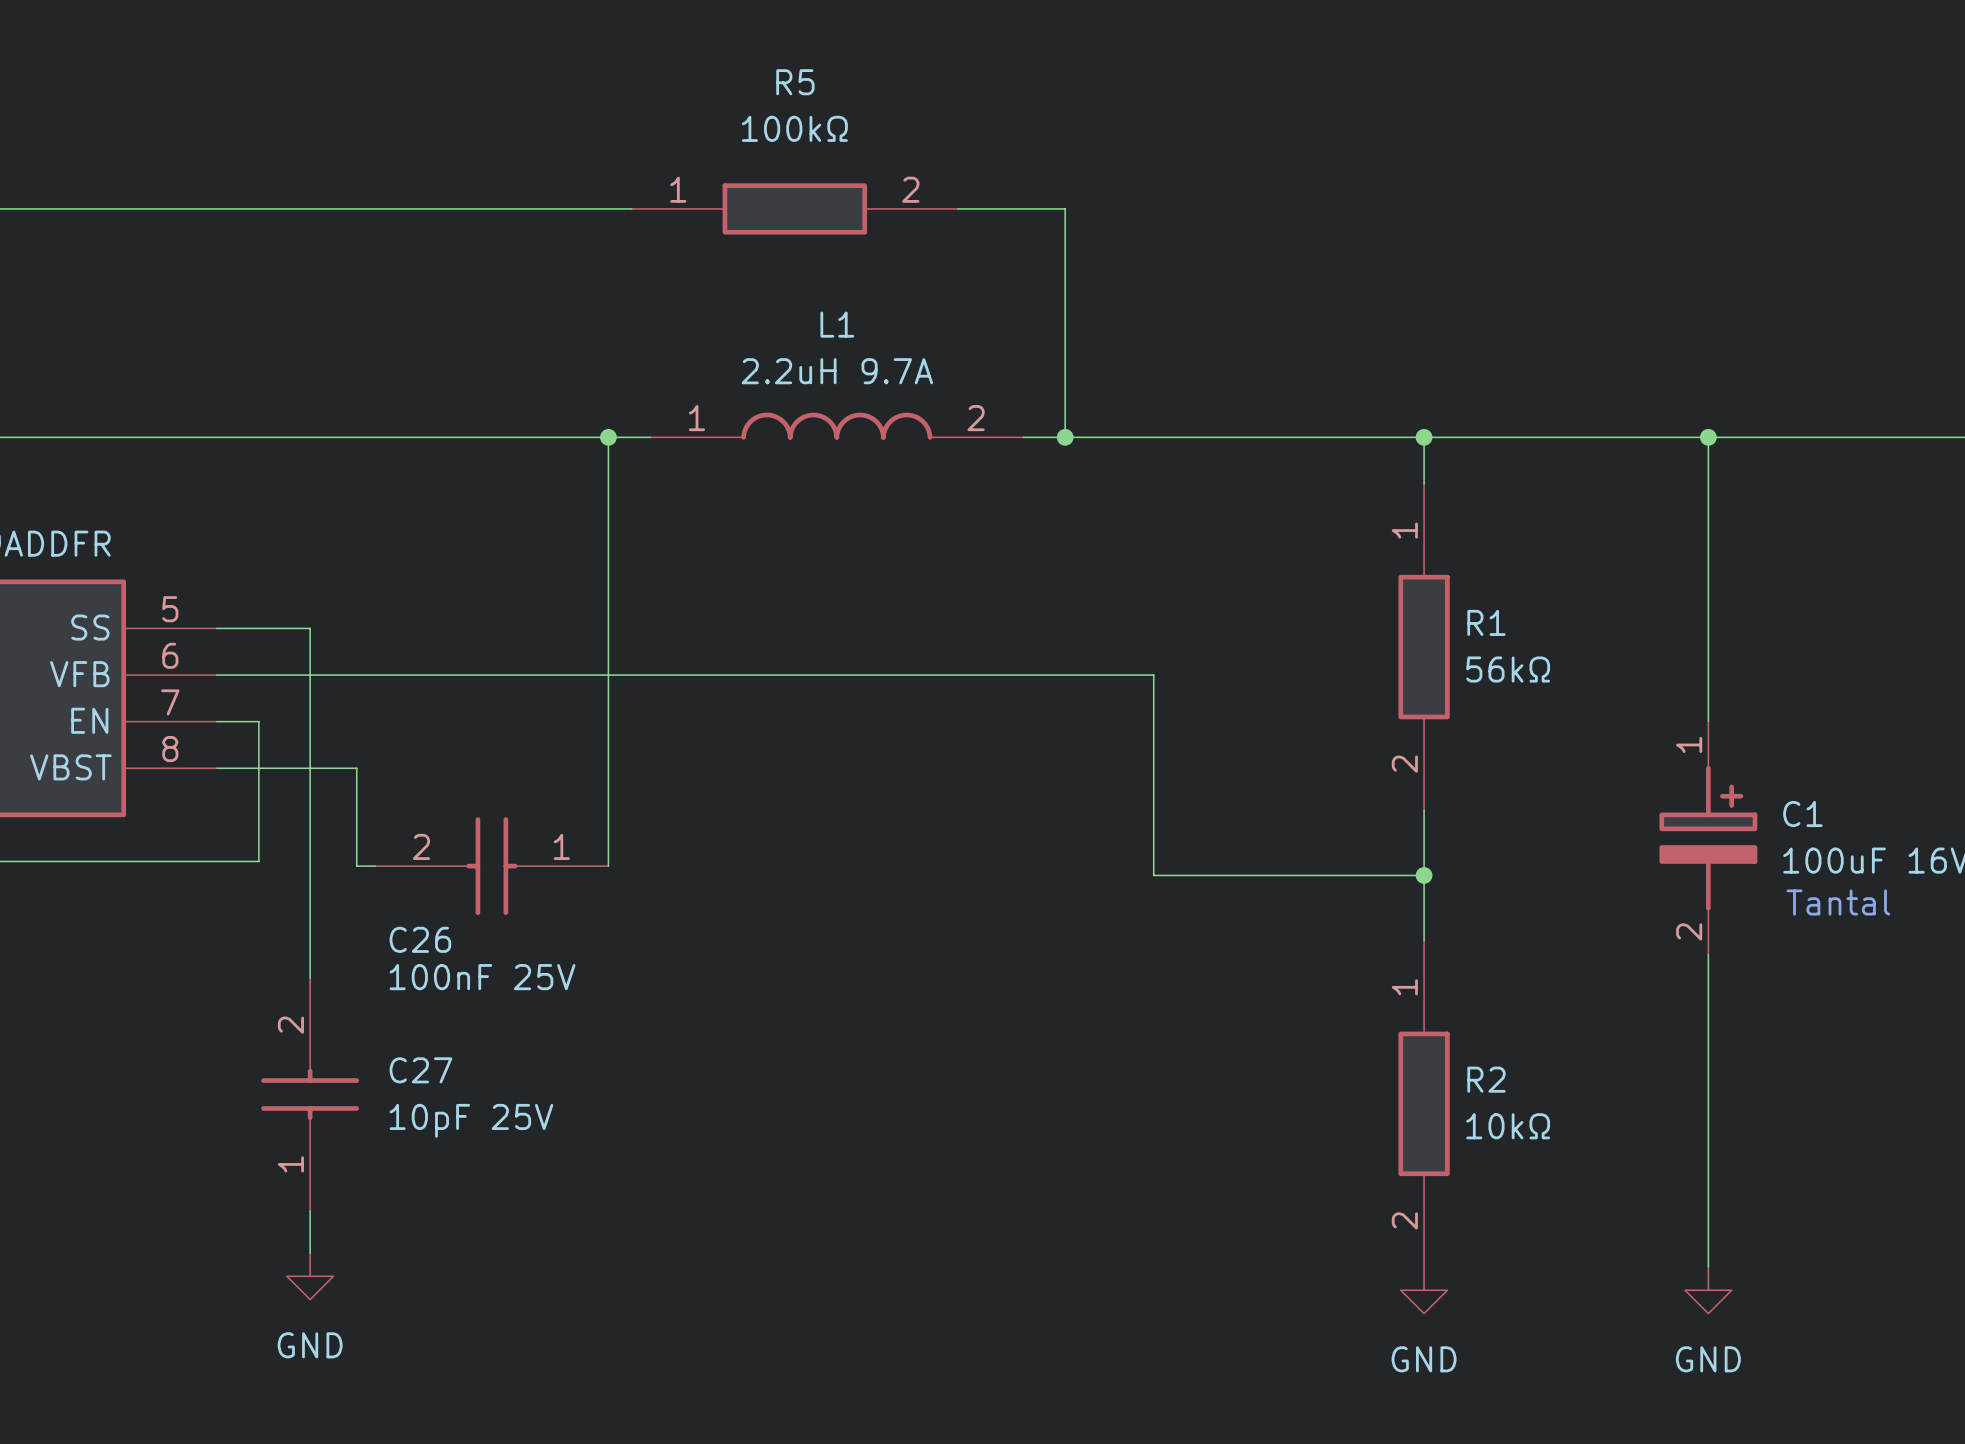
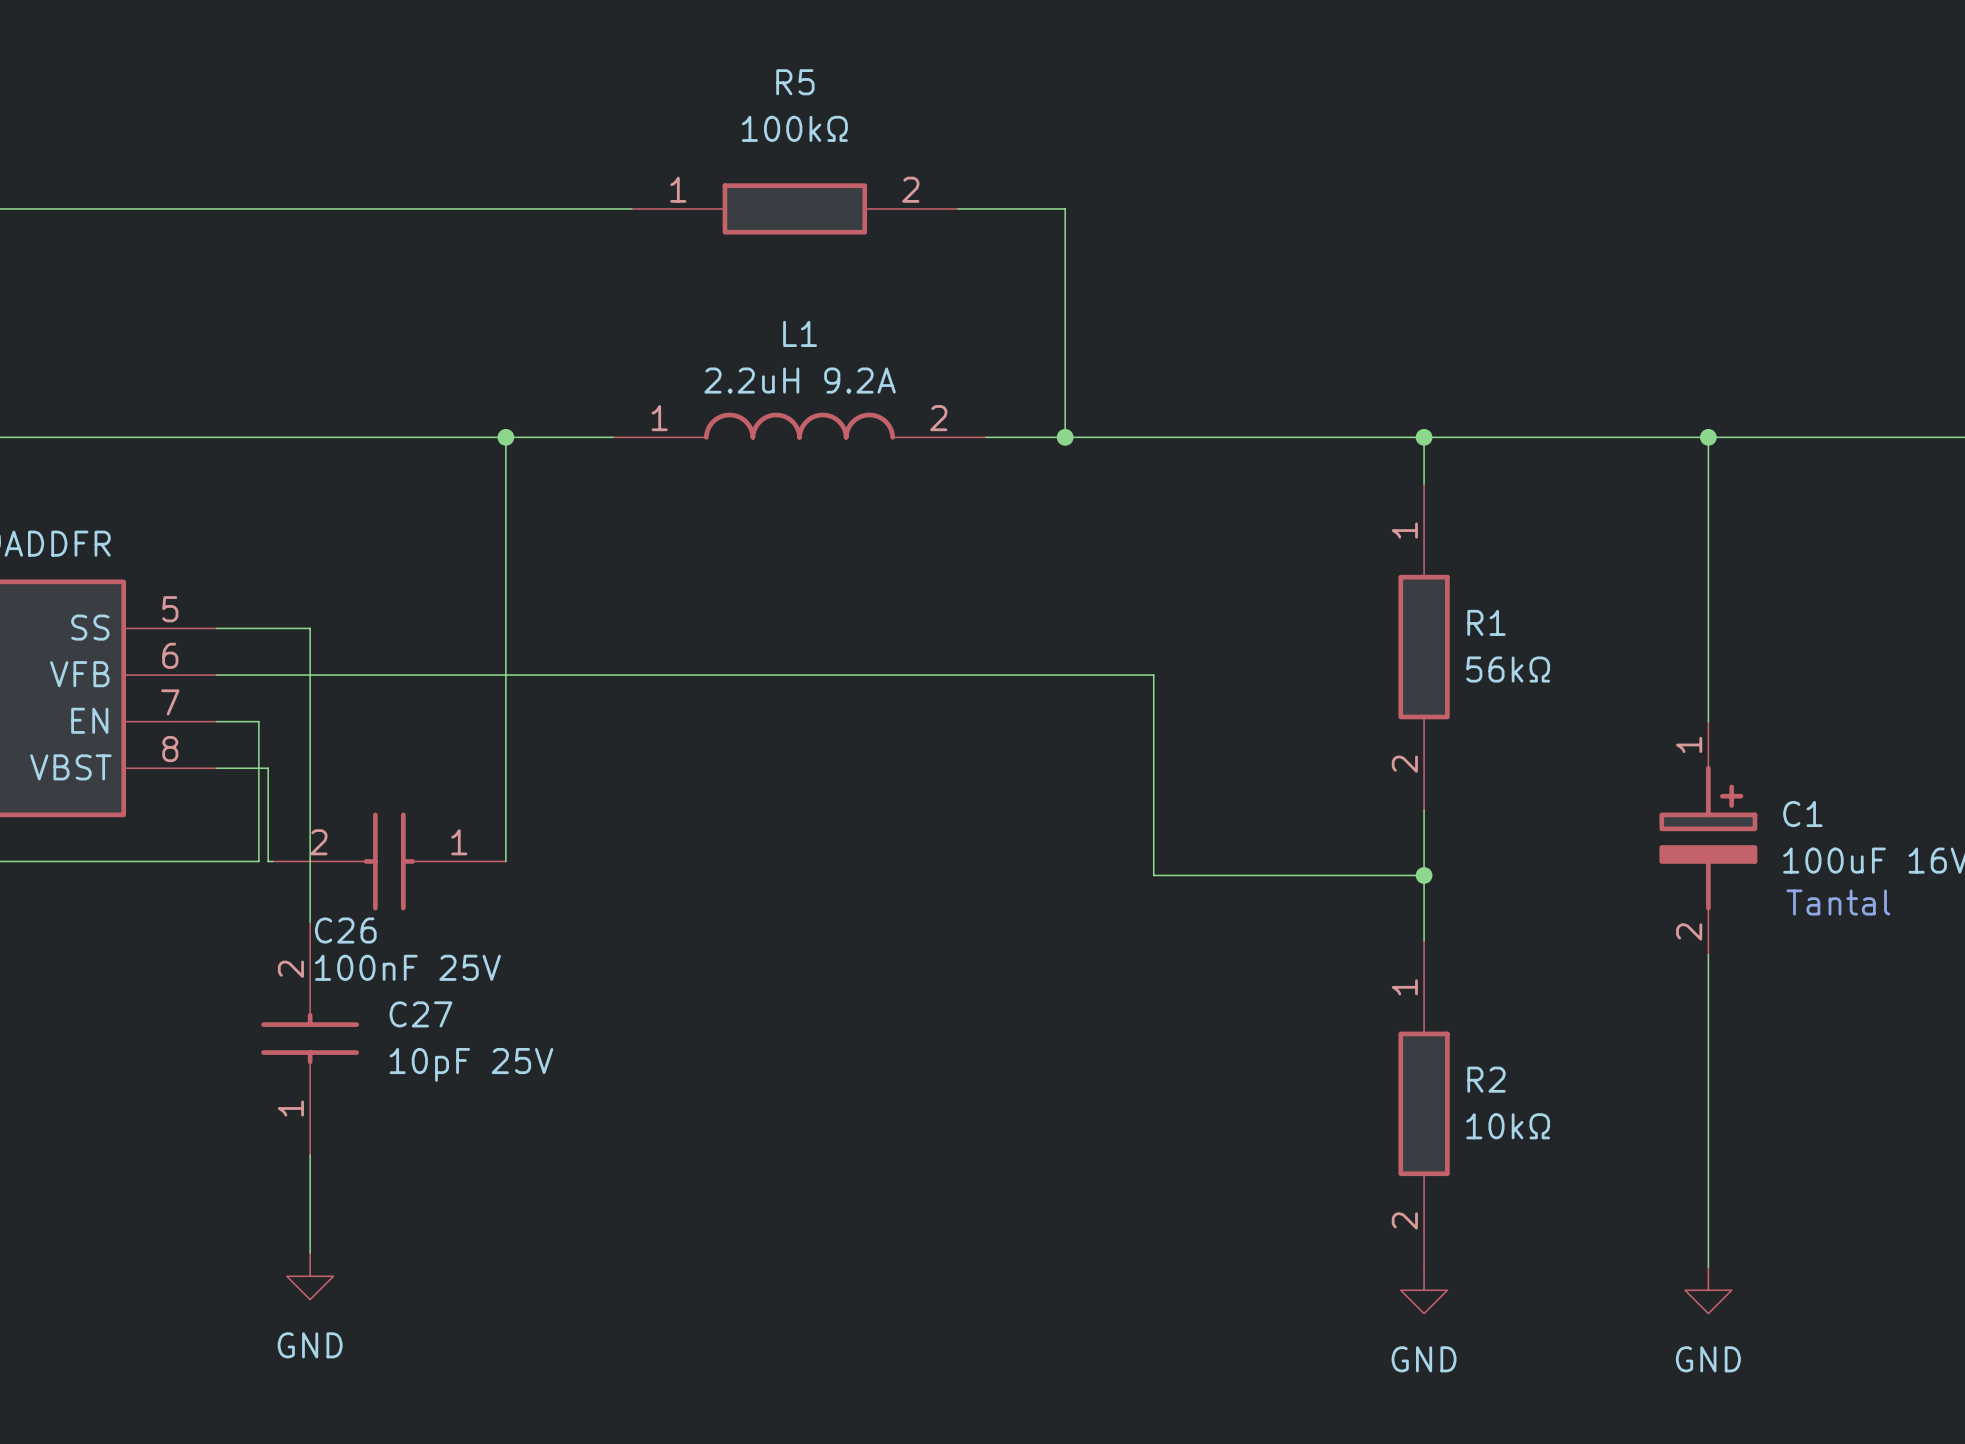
L1 name position: L1 (837, 324) -> L1 (800, 333)
L1 value: 2.2uH 9.7A (837, 371) -> 2.2uH 9.2A (800, 380)
L1 position: (836, 426) -> (799, 426)
wire: none -> (505, 437) (505, 861)
wire: (608, 437) (608, 866) -> none
junction position: (608, 437) -> (505, 437)
wire: (268, 768) (356, 768) (356, 866) (375, 866) -> (268, 768) (268, 861) (272, 861)
C26 position: (491, 866) -> (389, 861)
C26 name position: C26 (420, 939) -> C26 (345, 930)
C26 value position: 100nF 25V (482, 977) -> 100nF 25V (407, 967)
C27 position: (310, 1094) -> (310, 1038)

